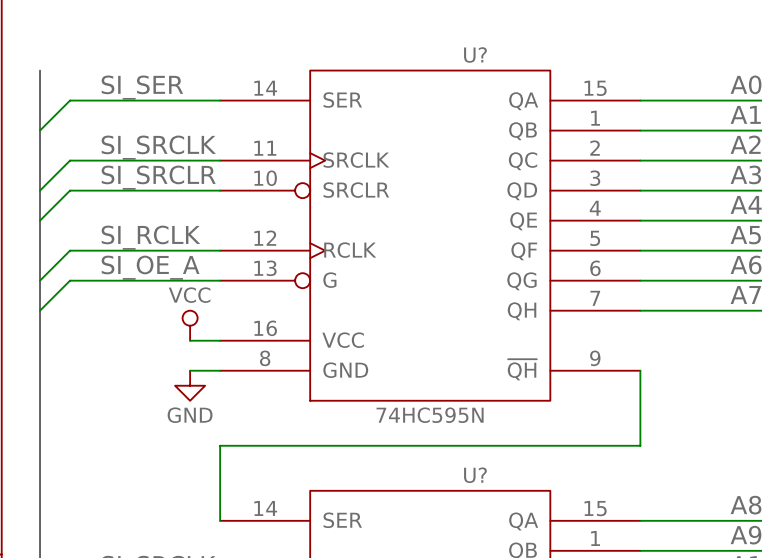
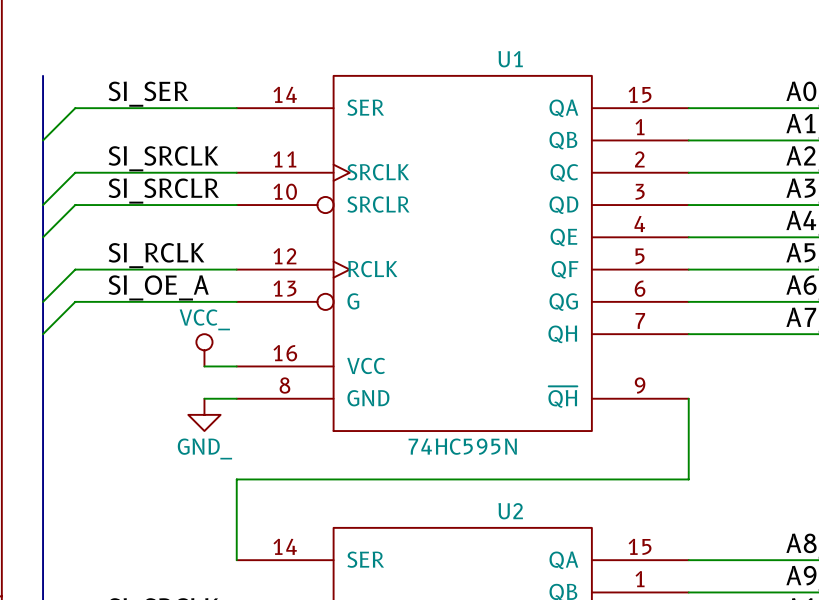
U? name: U? (475, 54) -> U1 (510, 59)
power symbol: VCC (190, 325) -> VCC_ (204, 350)
power symbol: GND (190, 385) -> GND_ (204, 414)
U? name: U? (475, 475) -> U2 (510, 511)

